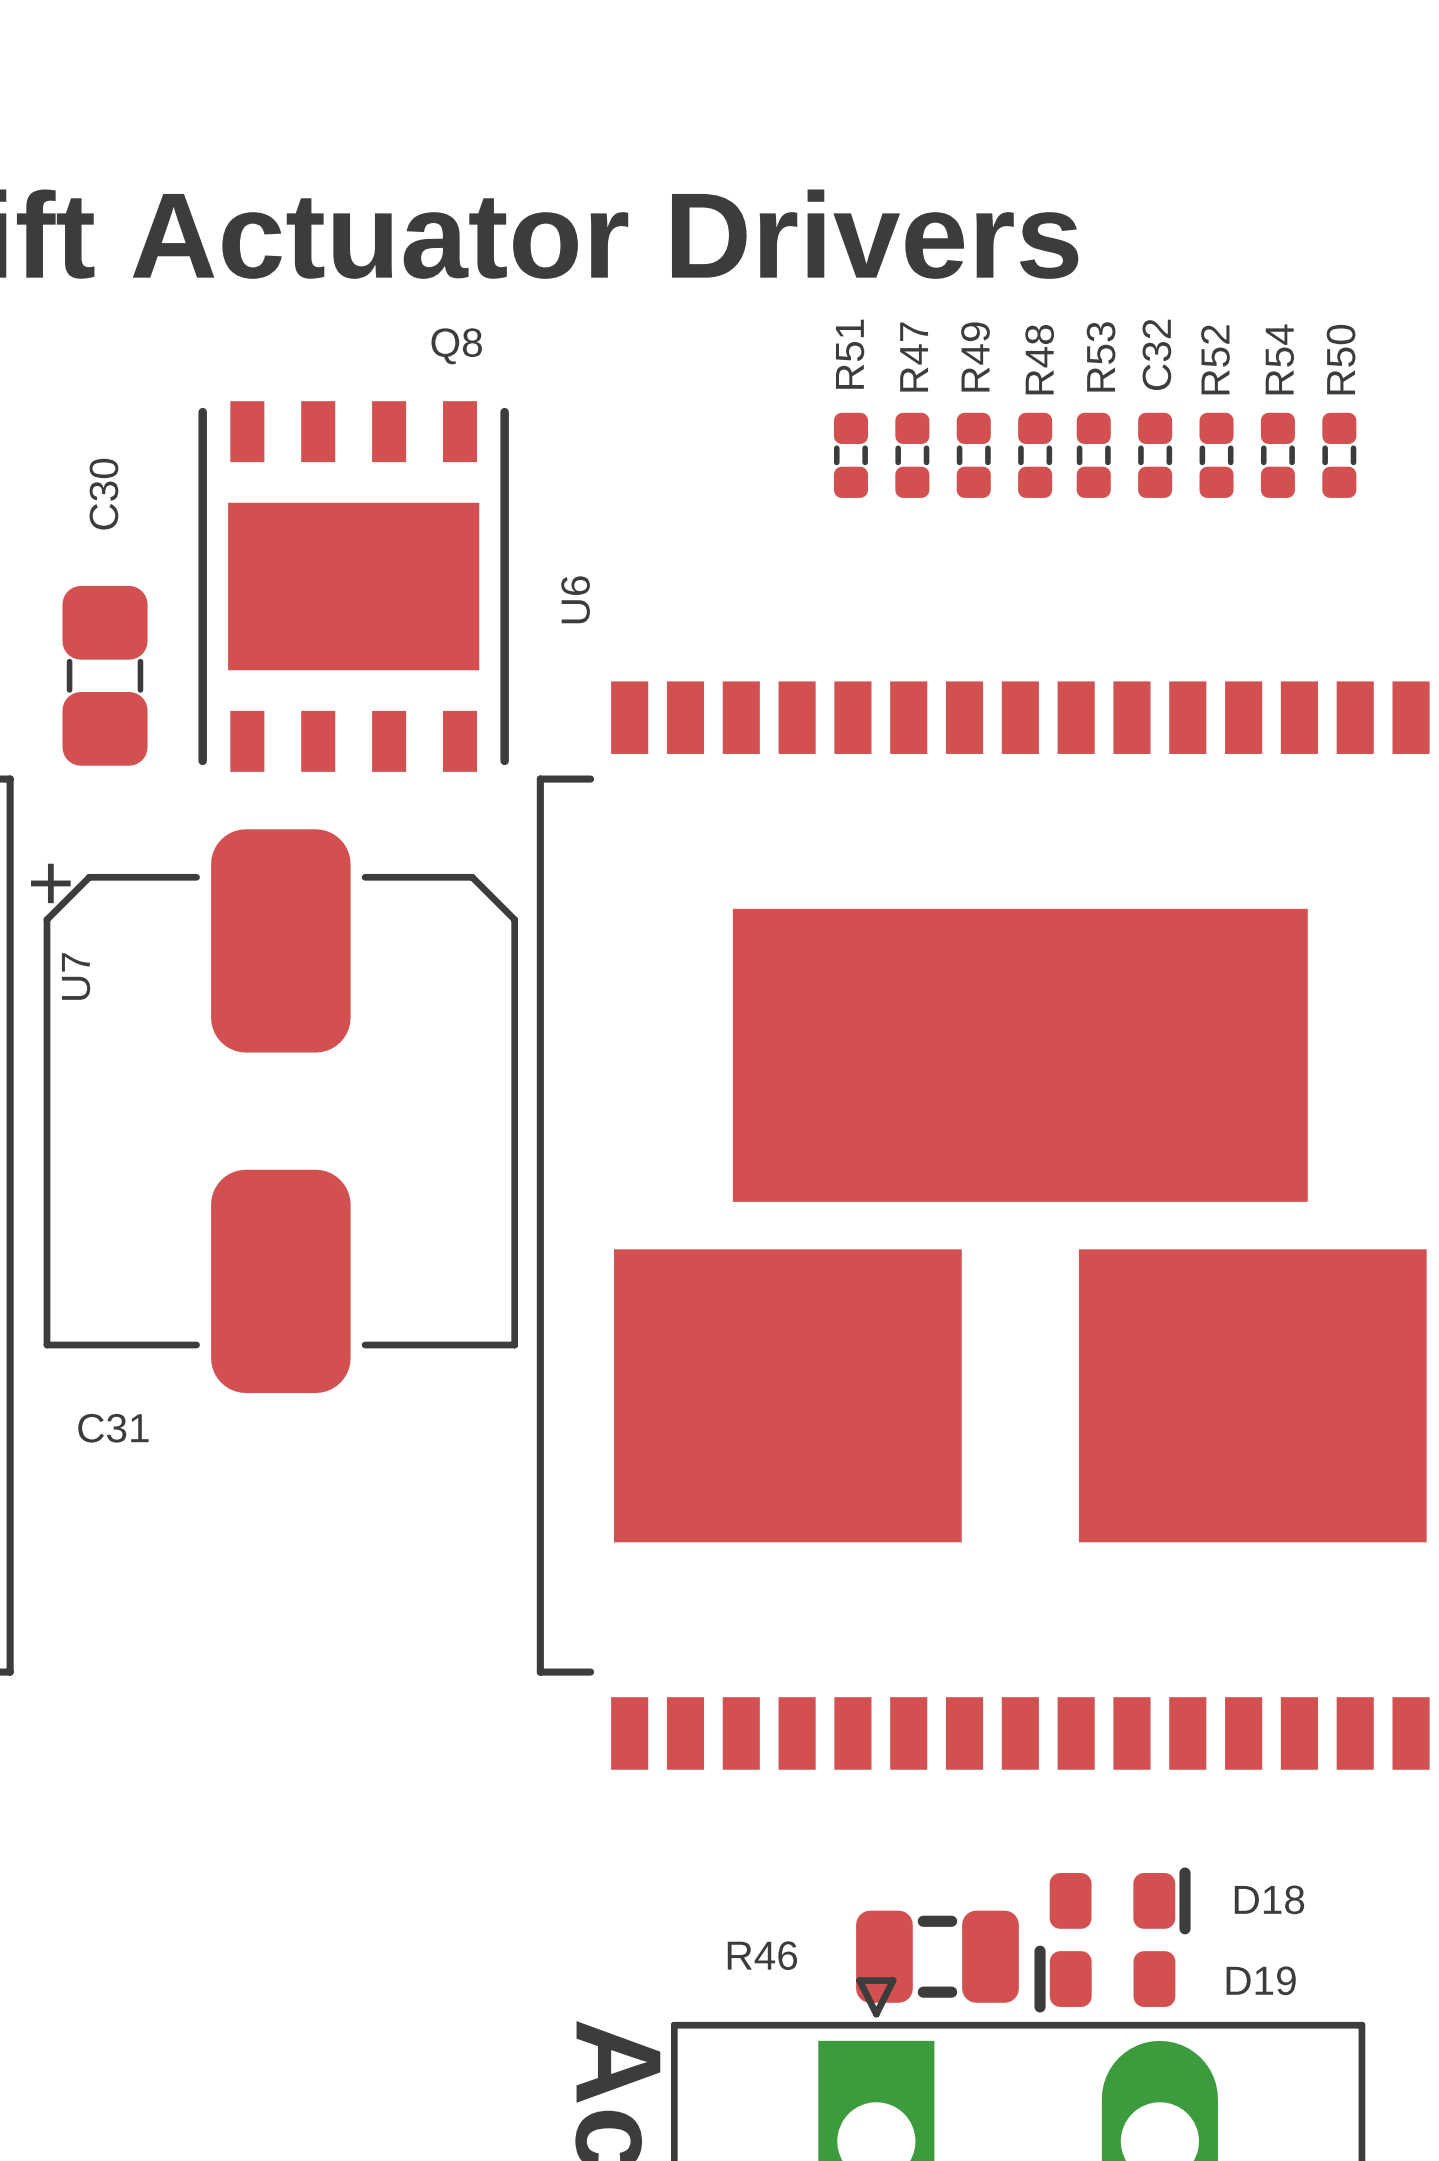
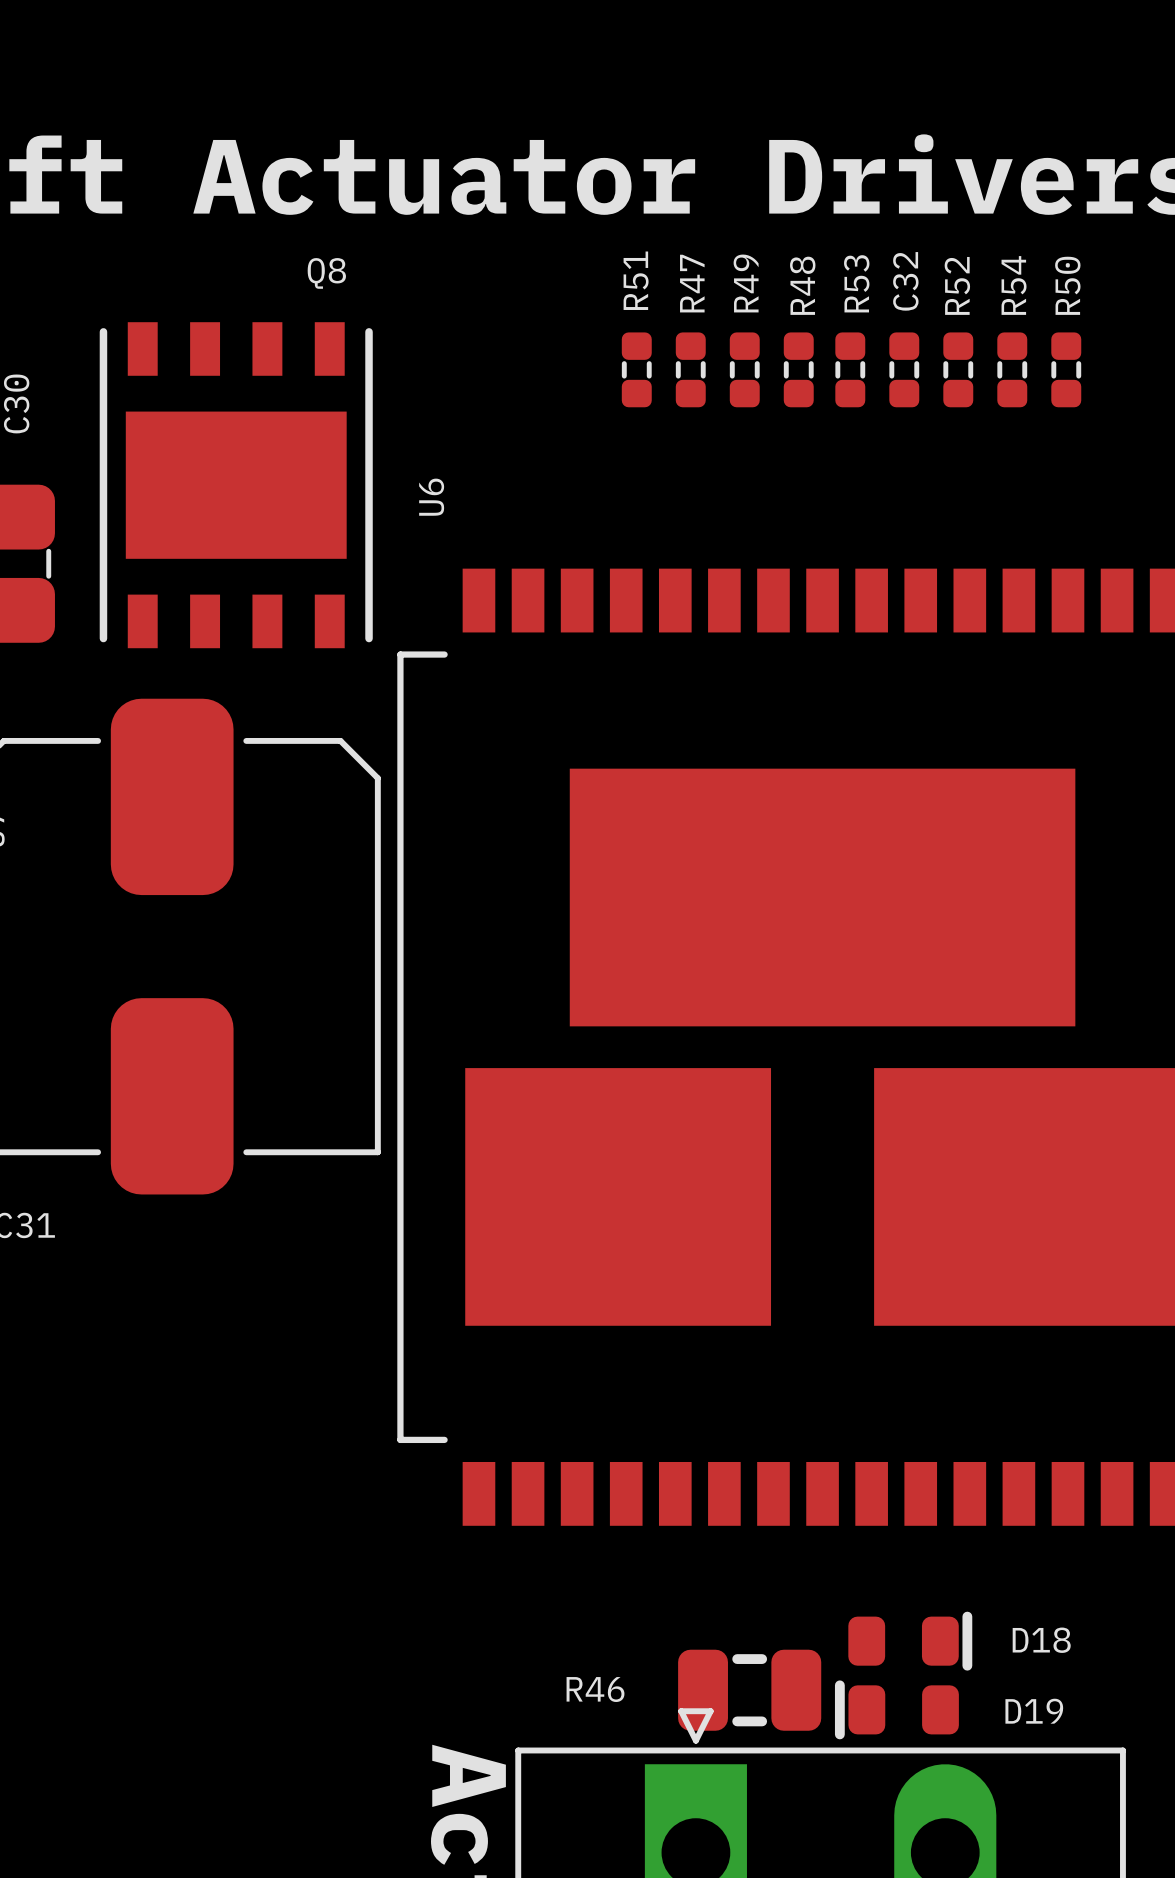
R51 position: (850, 455) -> (636, 369)
R47 position: (912, 455) -> (690, 369)
R49 position: (973, 455) -> (744, 369)
R48 position: (1035, 455) -> (798, 369)
R53 position: (1093, 455) -> (850, 369)
C32 position: (1155, 455) -> (904, 369)
R52 position: (1216, 455) -> (958, 369)
R54 position: (1277, 455) -> (1012, 369)
R50 position: (1339, 455) -> (1066, 369)

